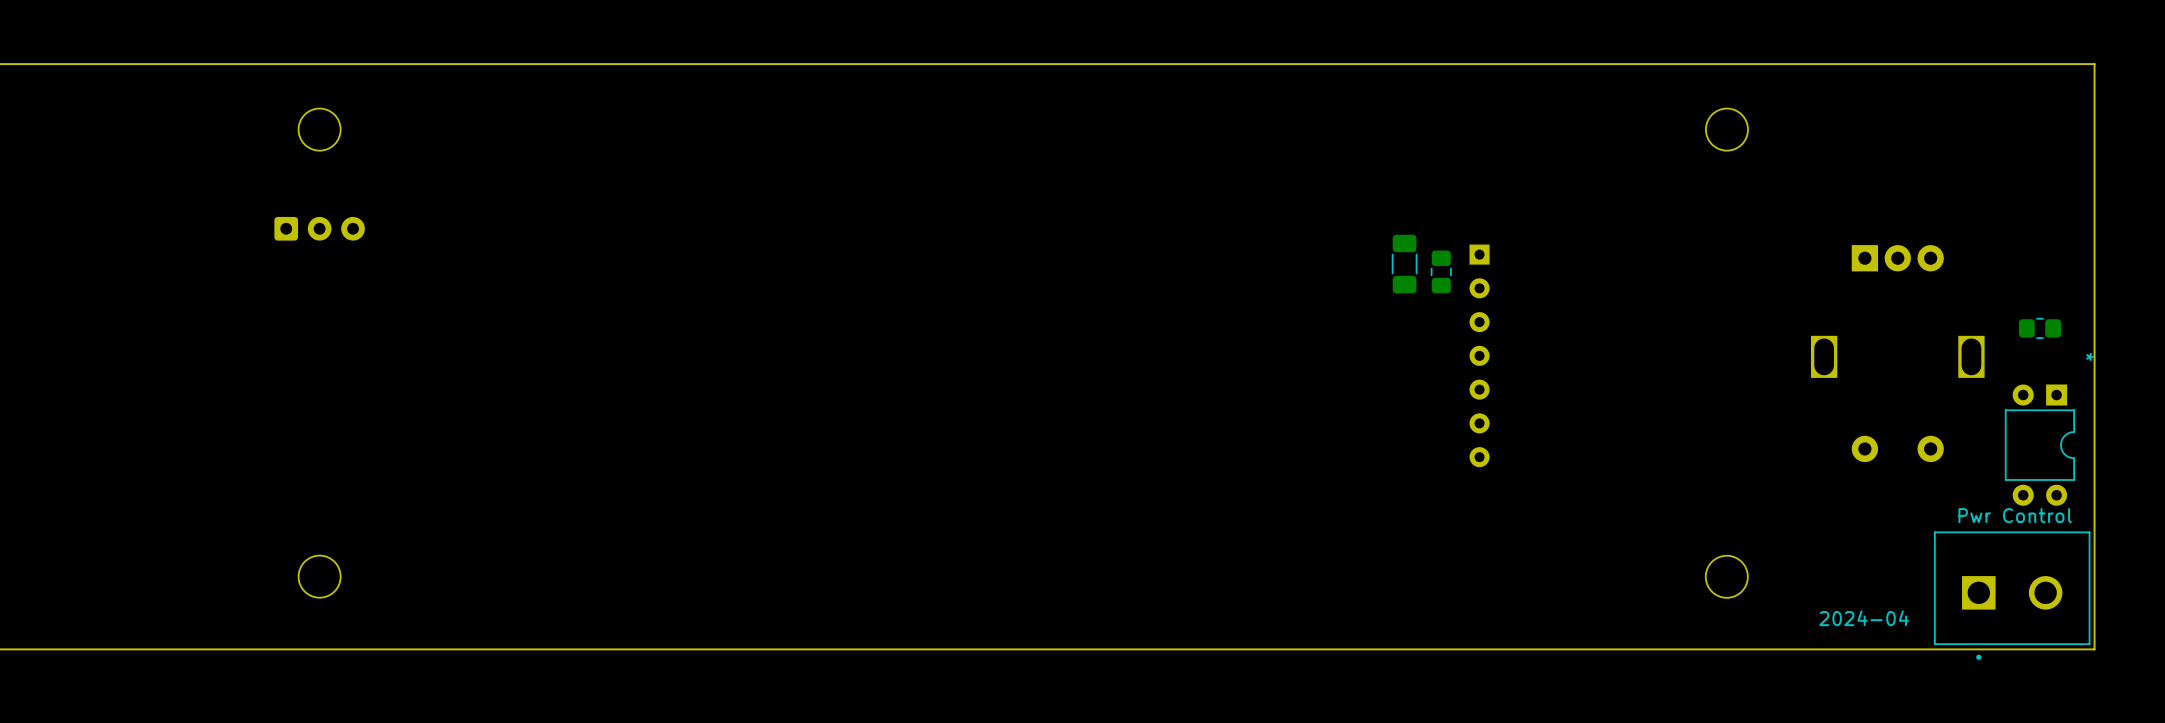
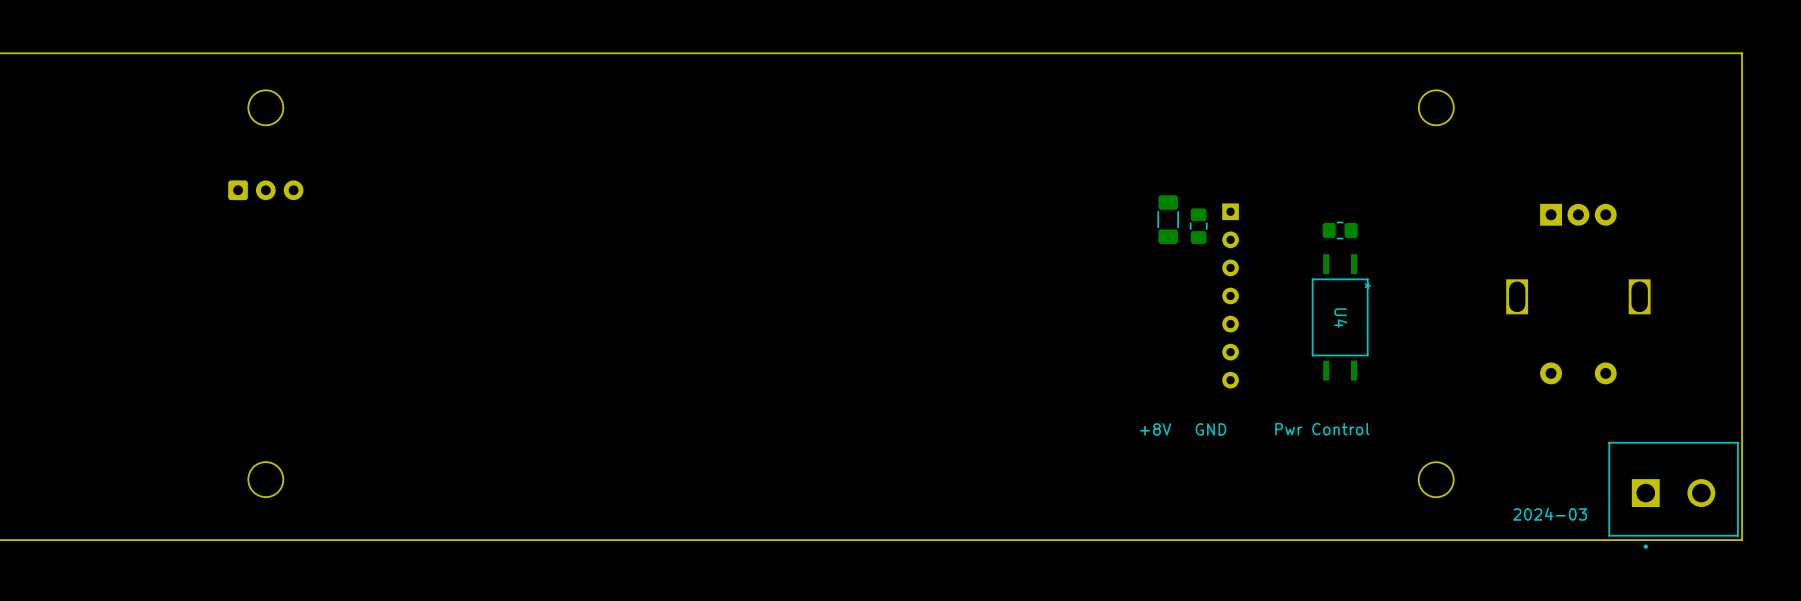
part: none -> (1340, 230)
part: (2039, 328) -> none
U4: none -> (1340, 317)
part: (2039, 445) -> none
text: none -> Pwr Control (1322, 429)
text: Pwr Control (2015, 515) -> none
text: none -> +8V (1155, 429)
text: none -> GND (1210, 429)
text: 2024-04 (1864, 618) -> 2024-03 (1550, 514)

